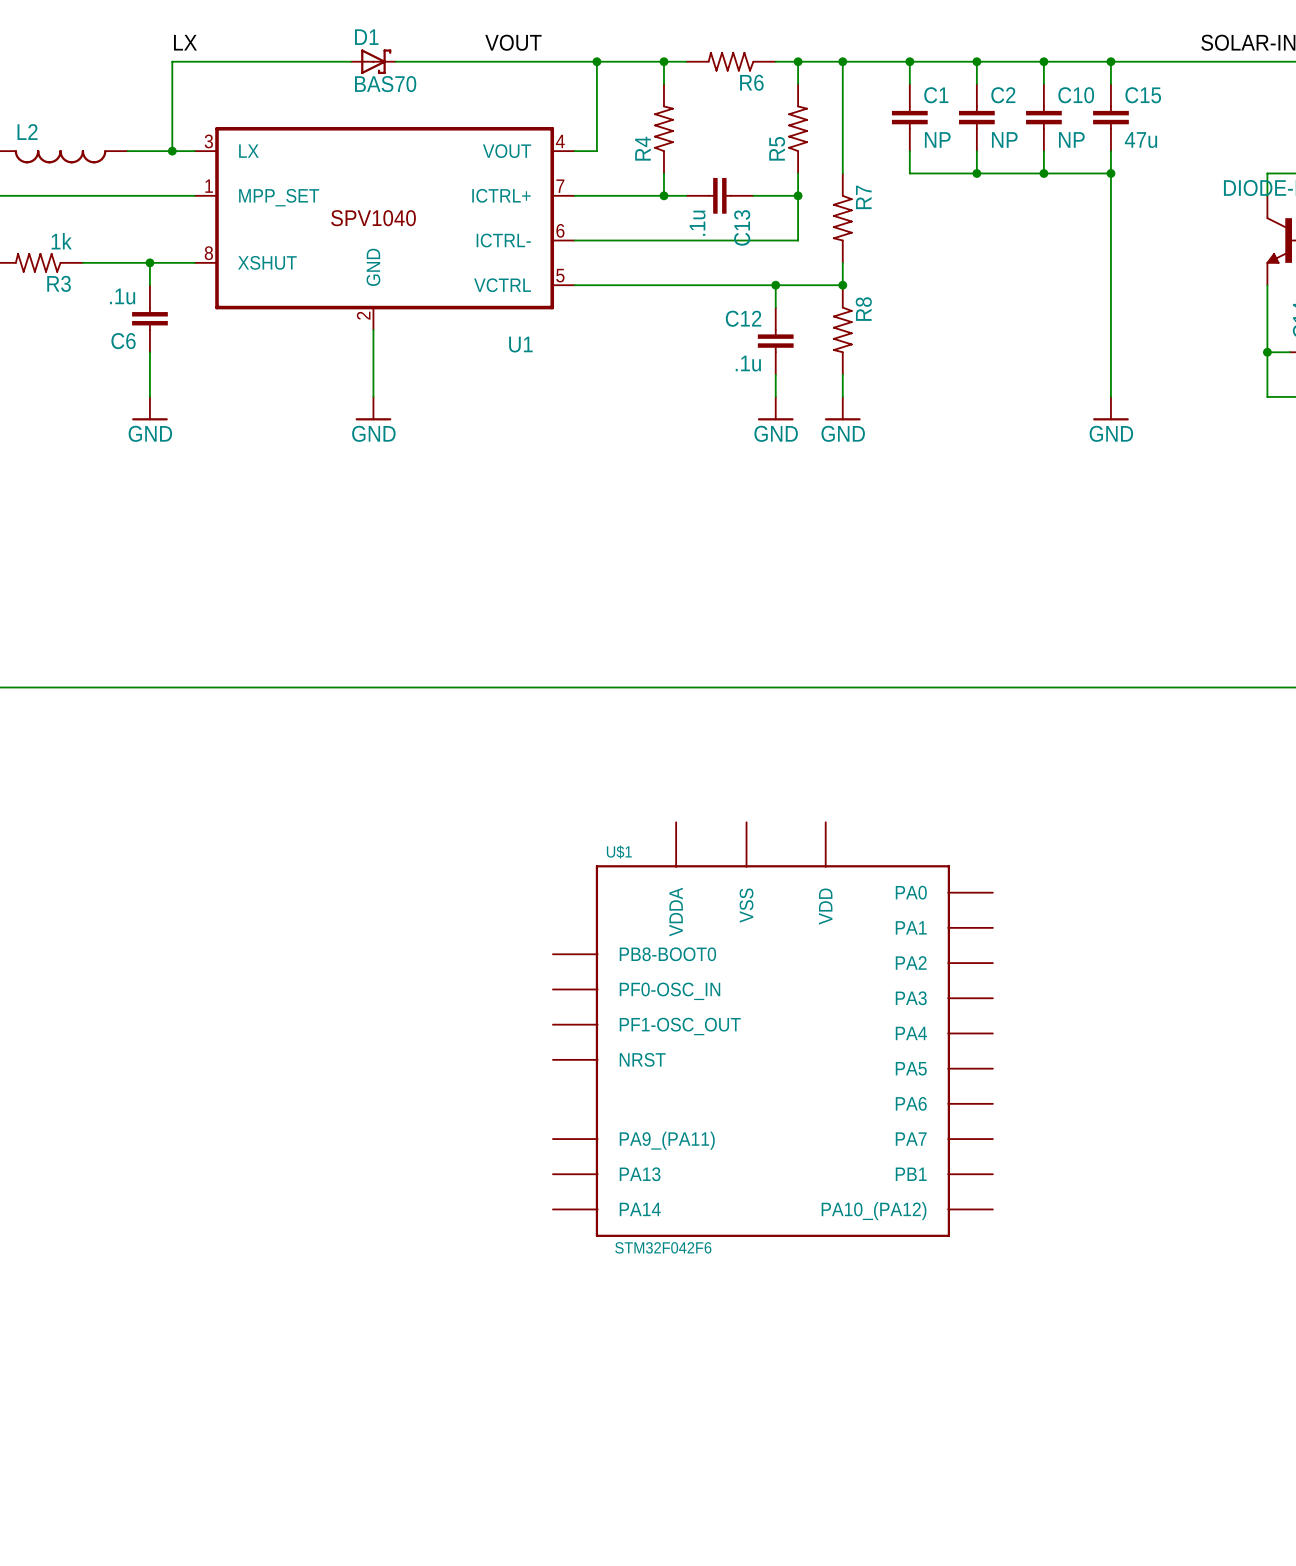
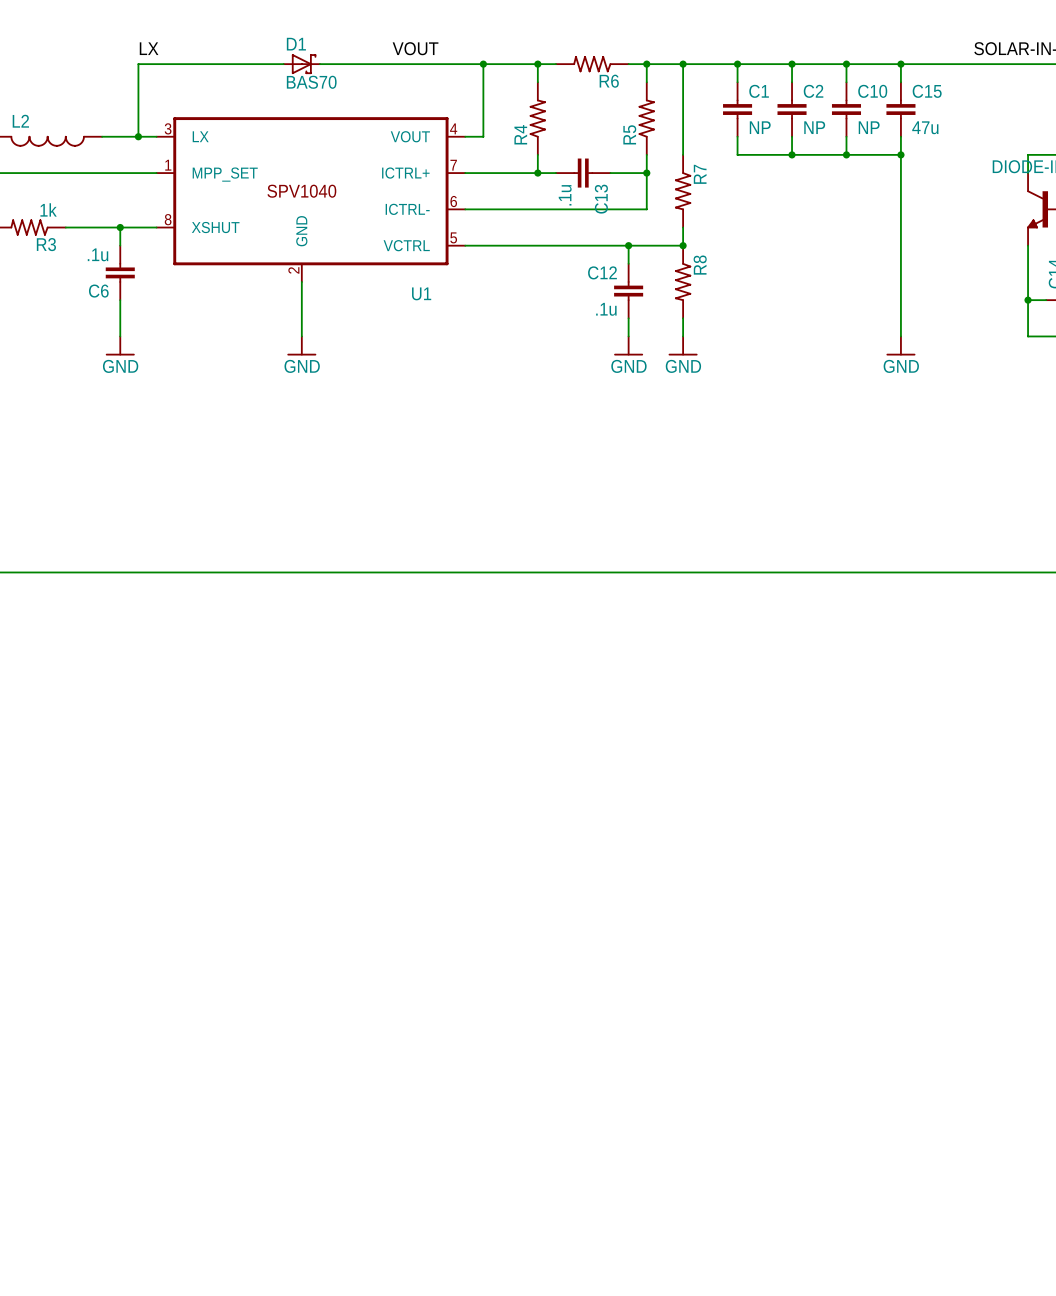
U$1: STM32F042F6 (772, 1029) -> none

